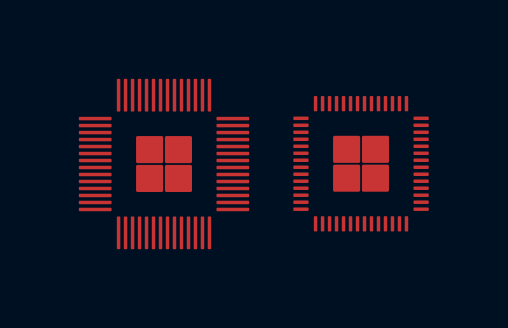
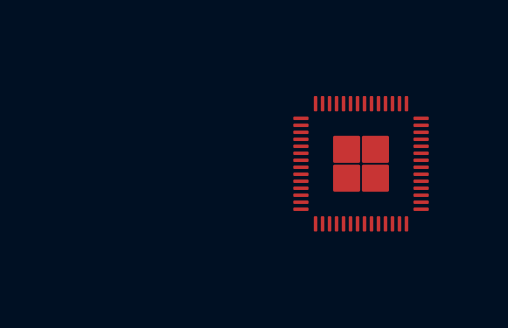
part: (164, 164) -> none

